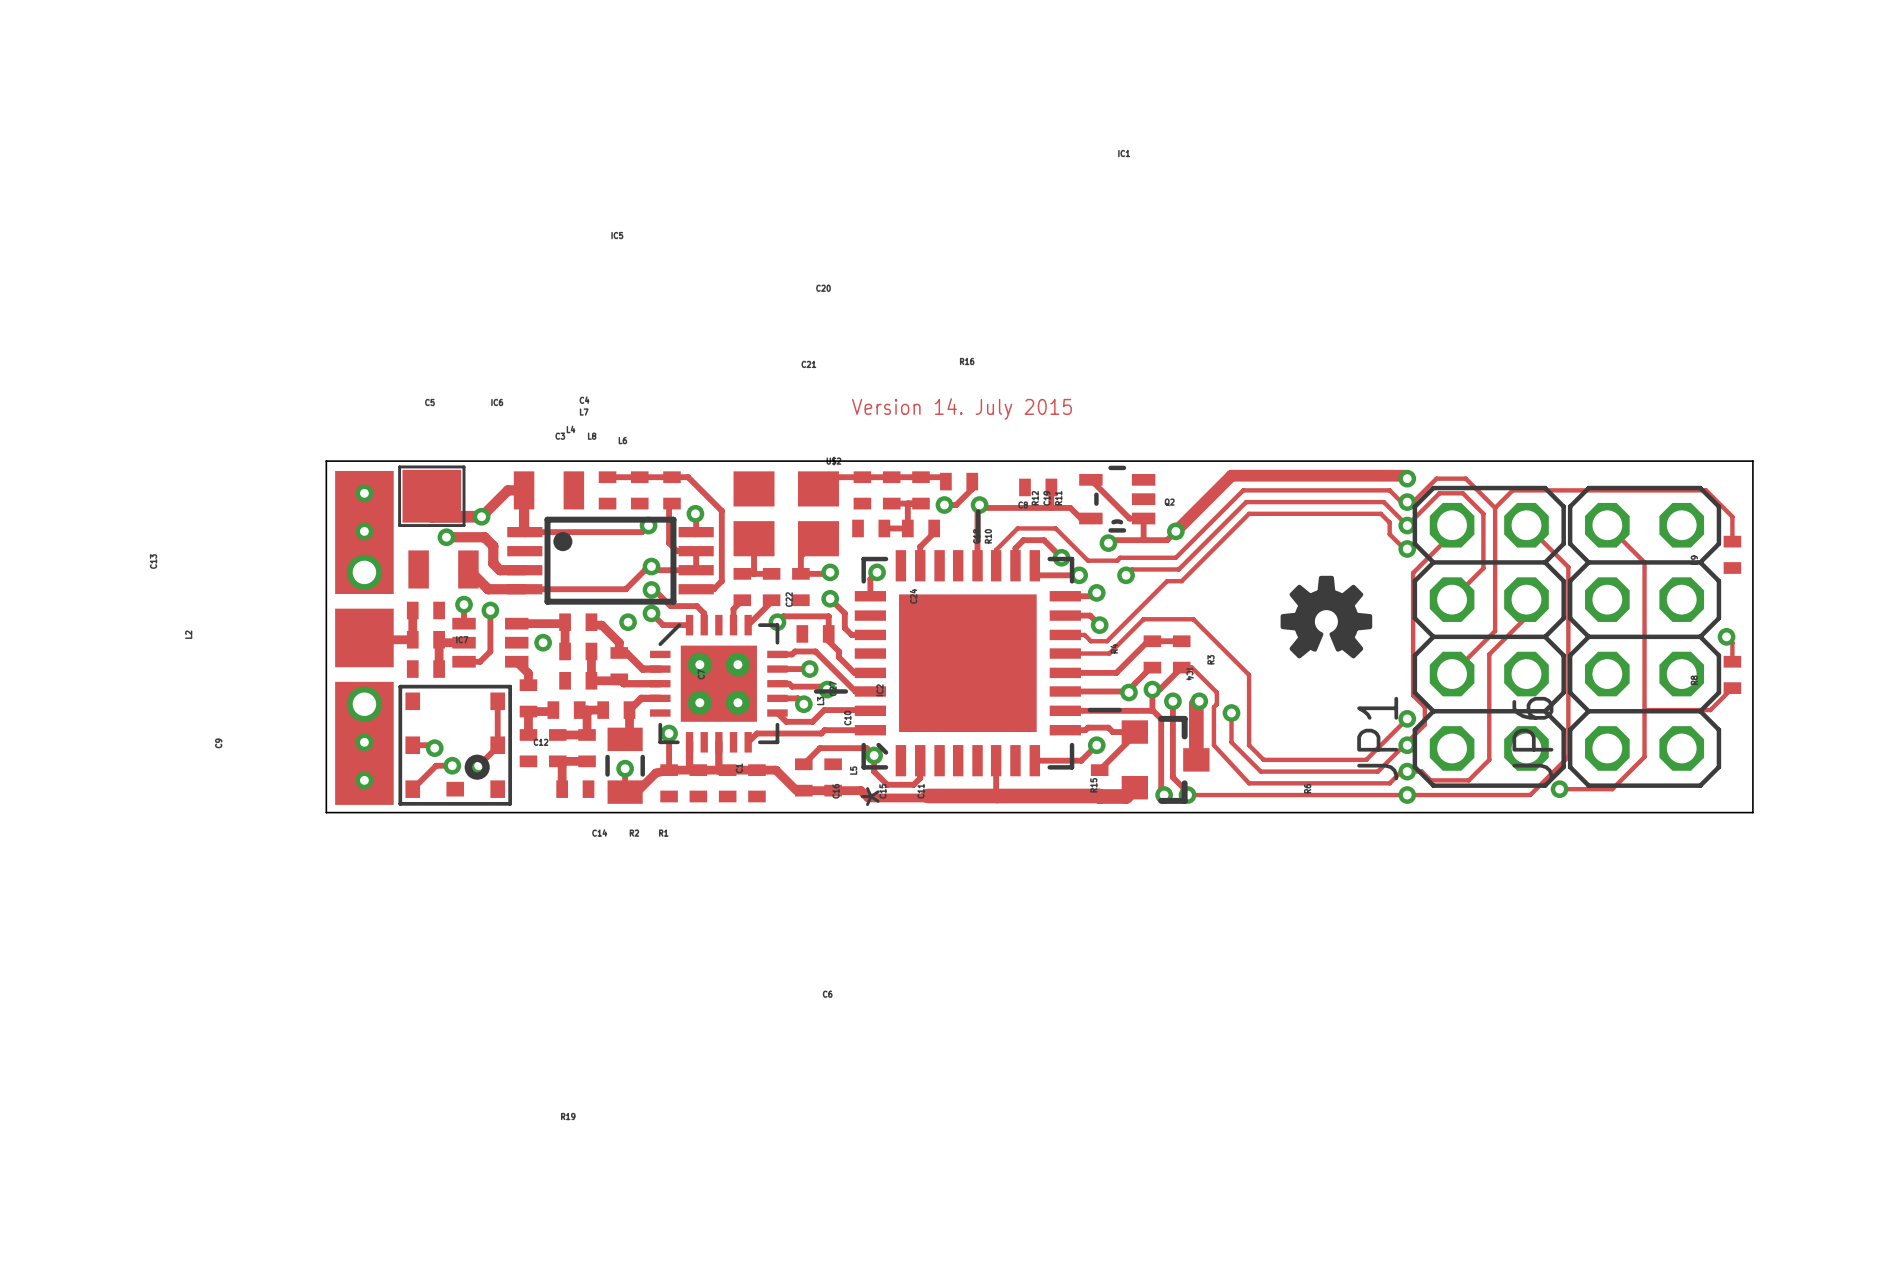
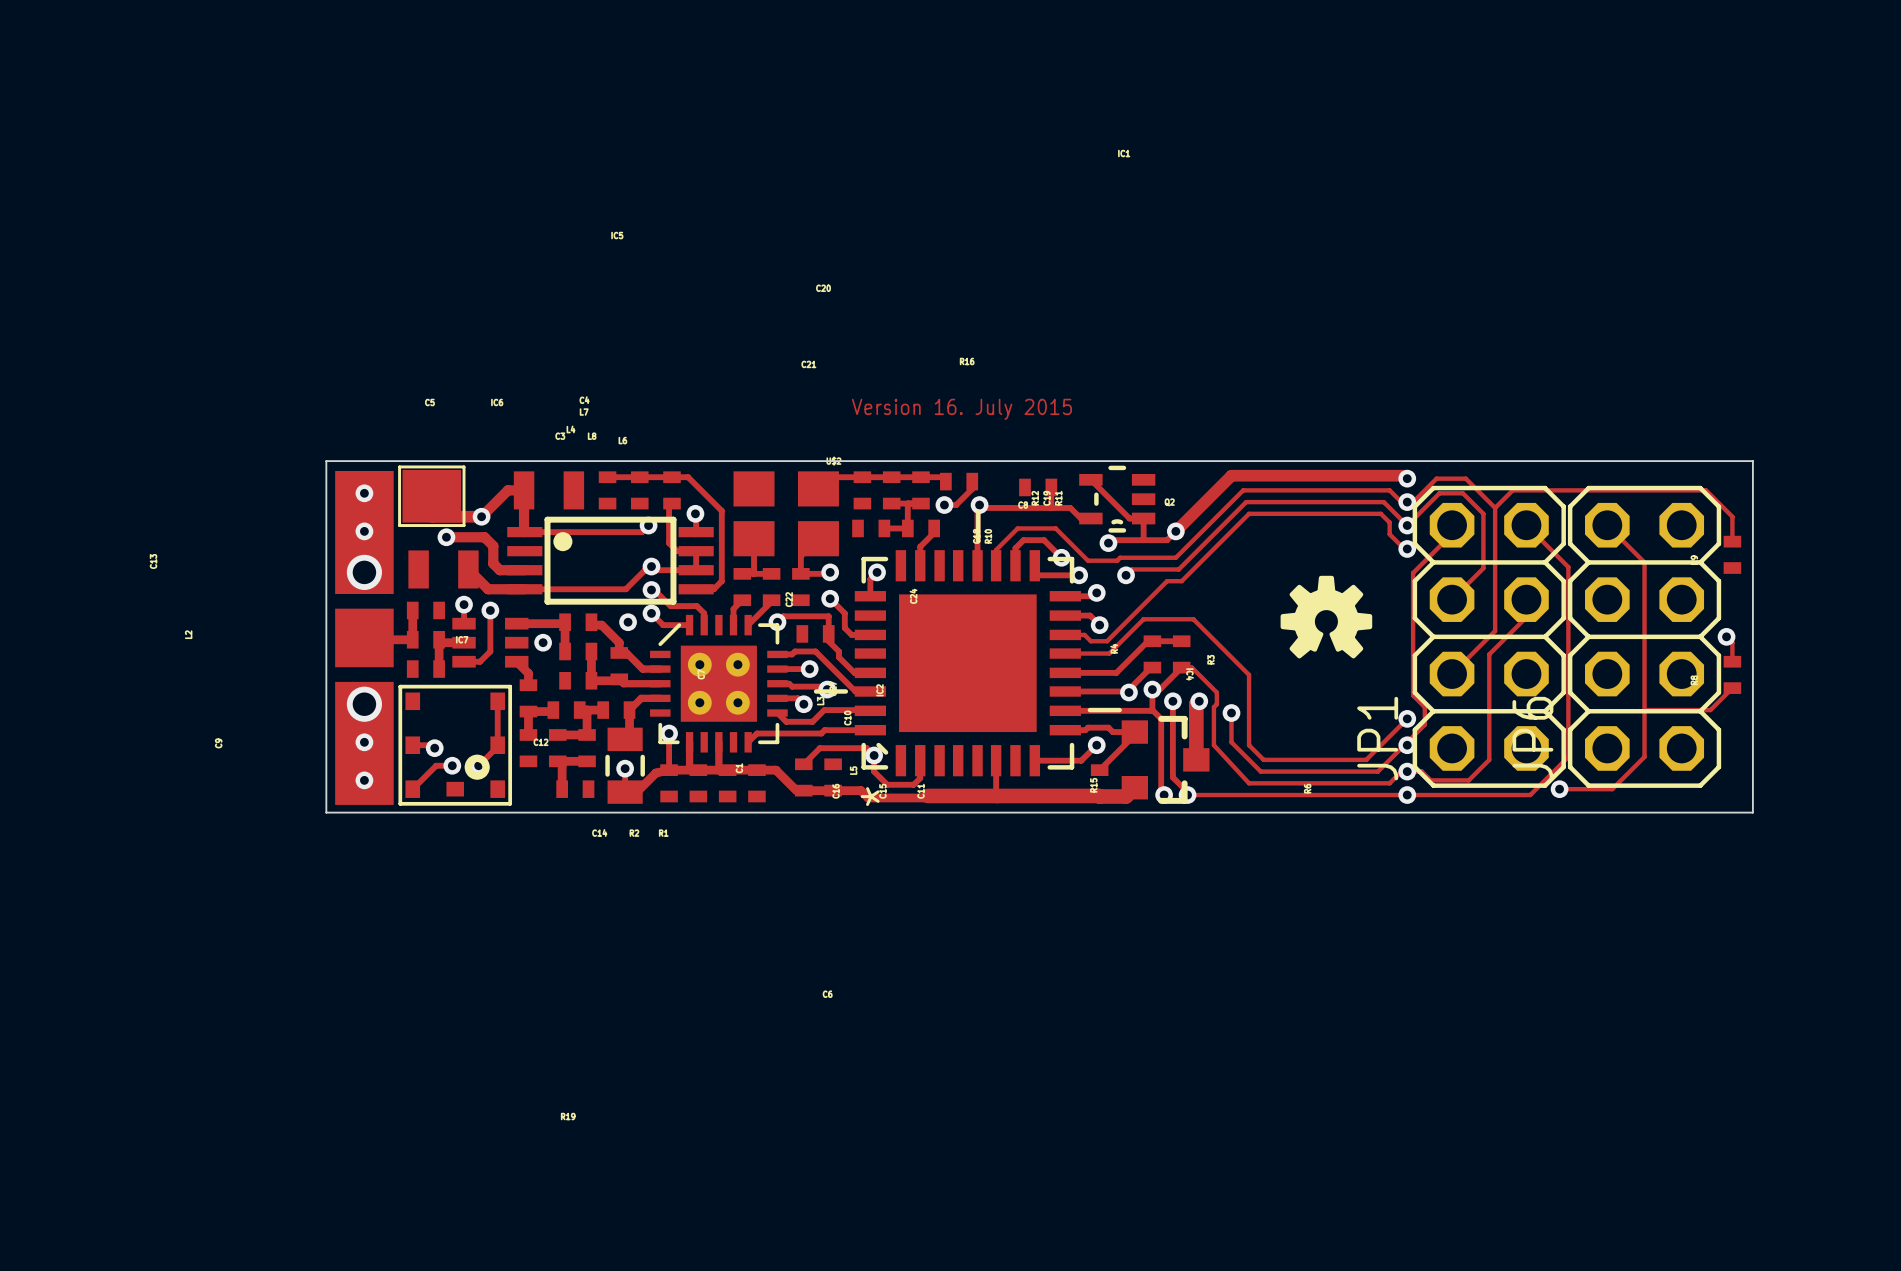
text: Version 14. July 2015 (961, 408) -> Version 16. July 2015 (961, 409)

